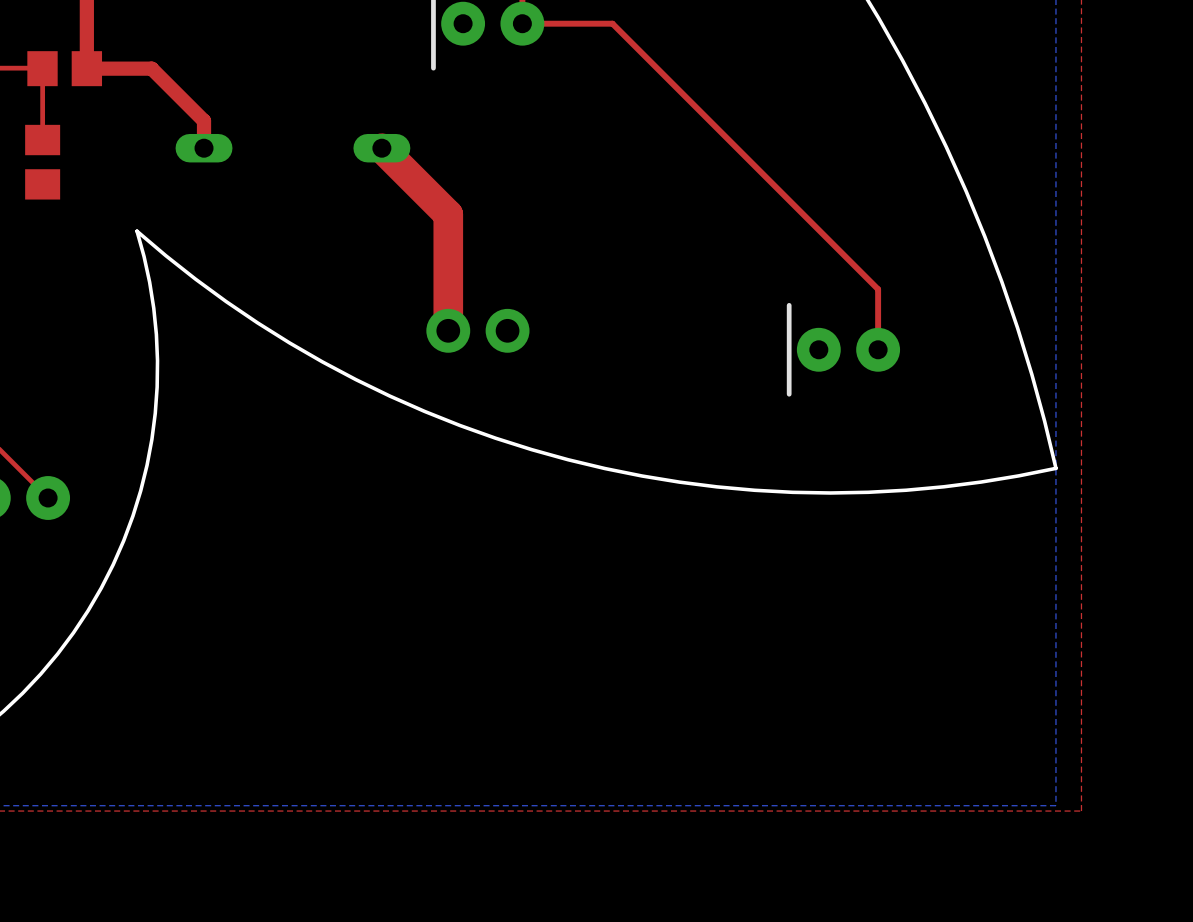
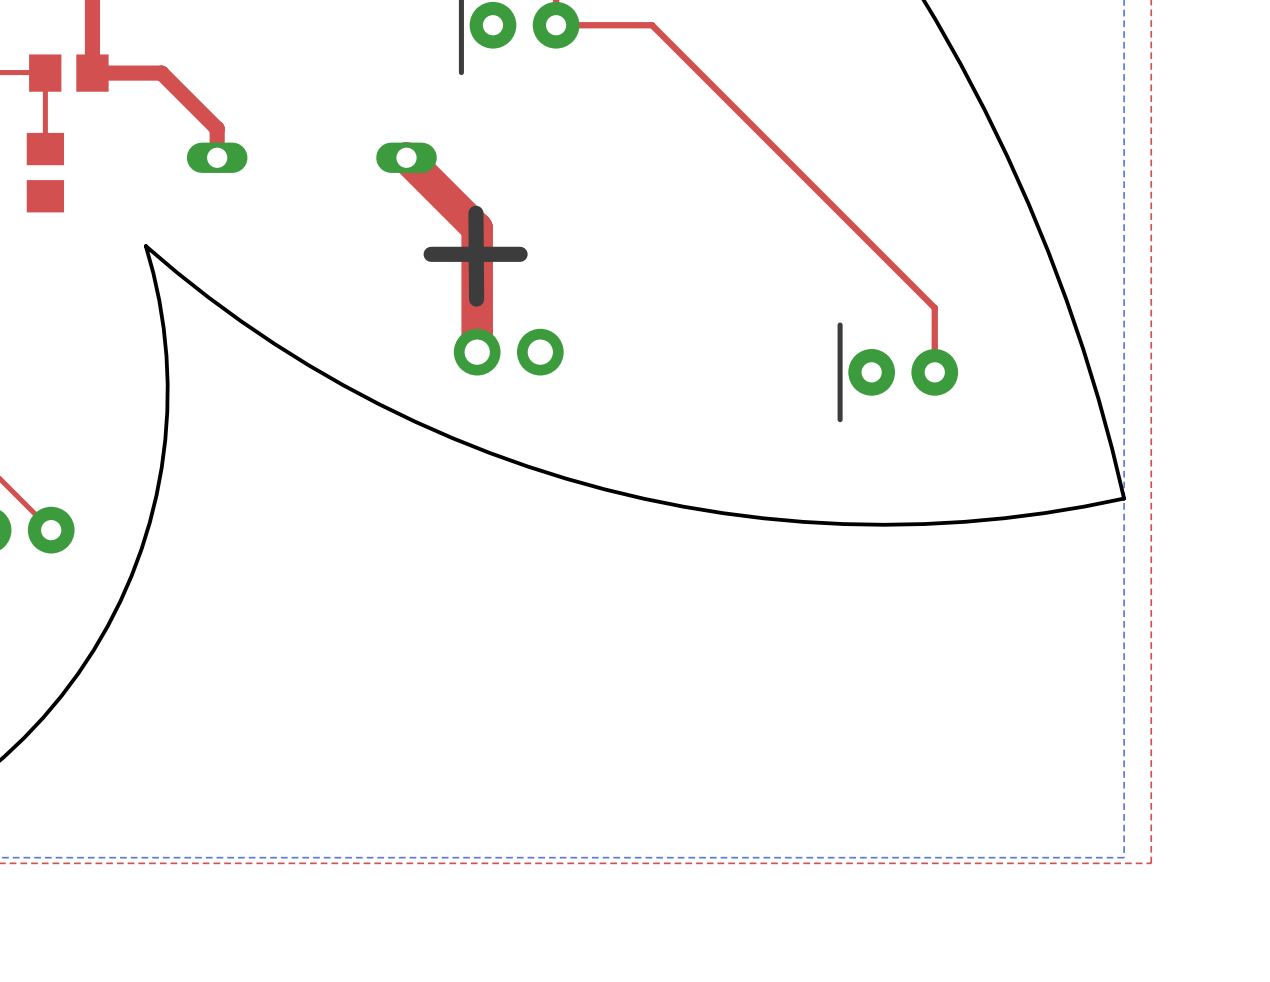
line: none -> (475, 213) (476, 299)
line: none -> (520, 254) (431, 254)

